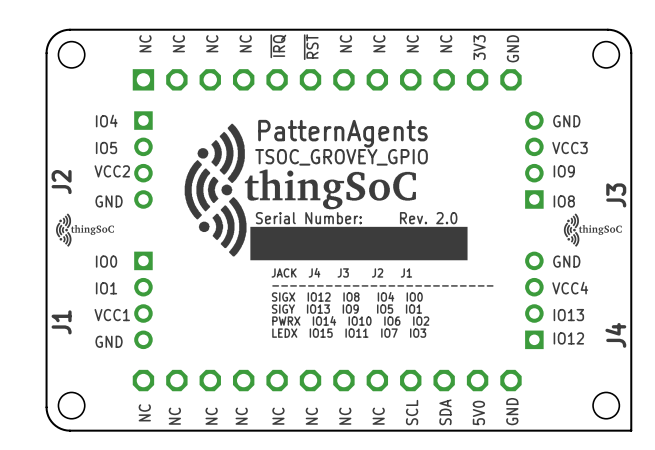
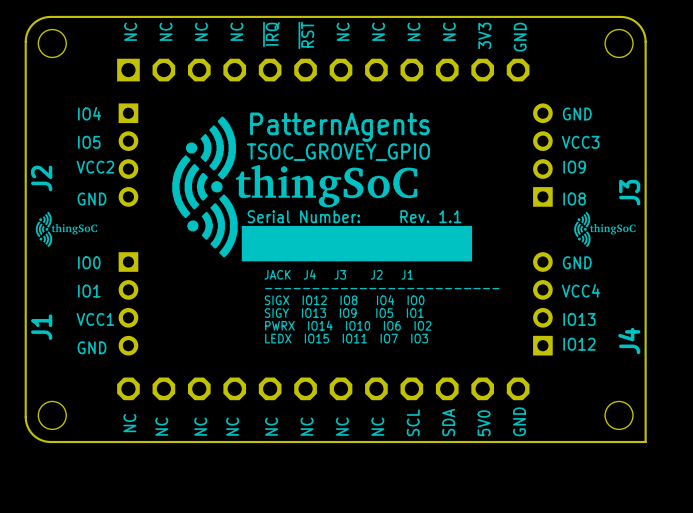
text: Rev. 2.0 (428, 218) -> Rev. 1.1 (430, 216)

